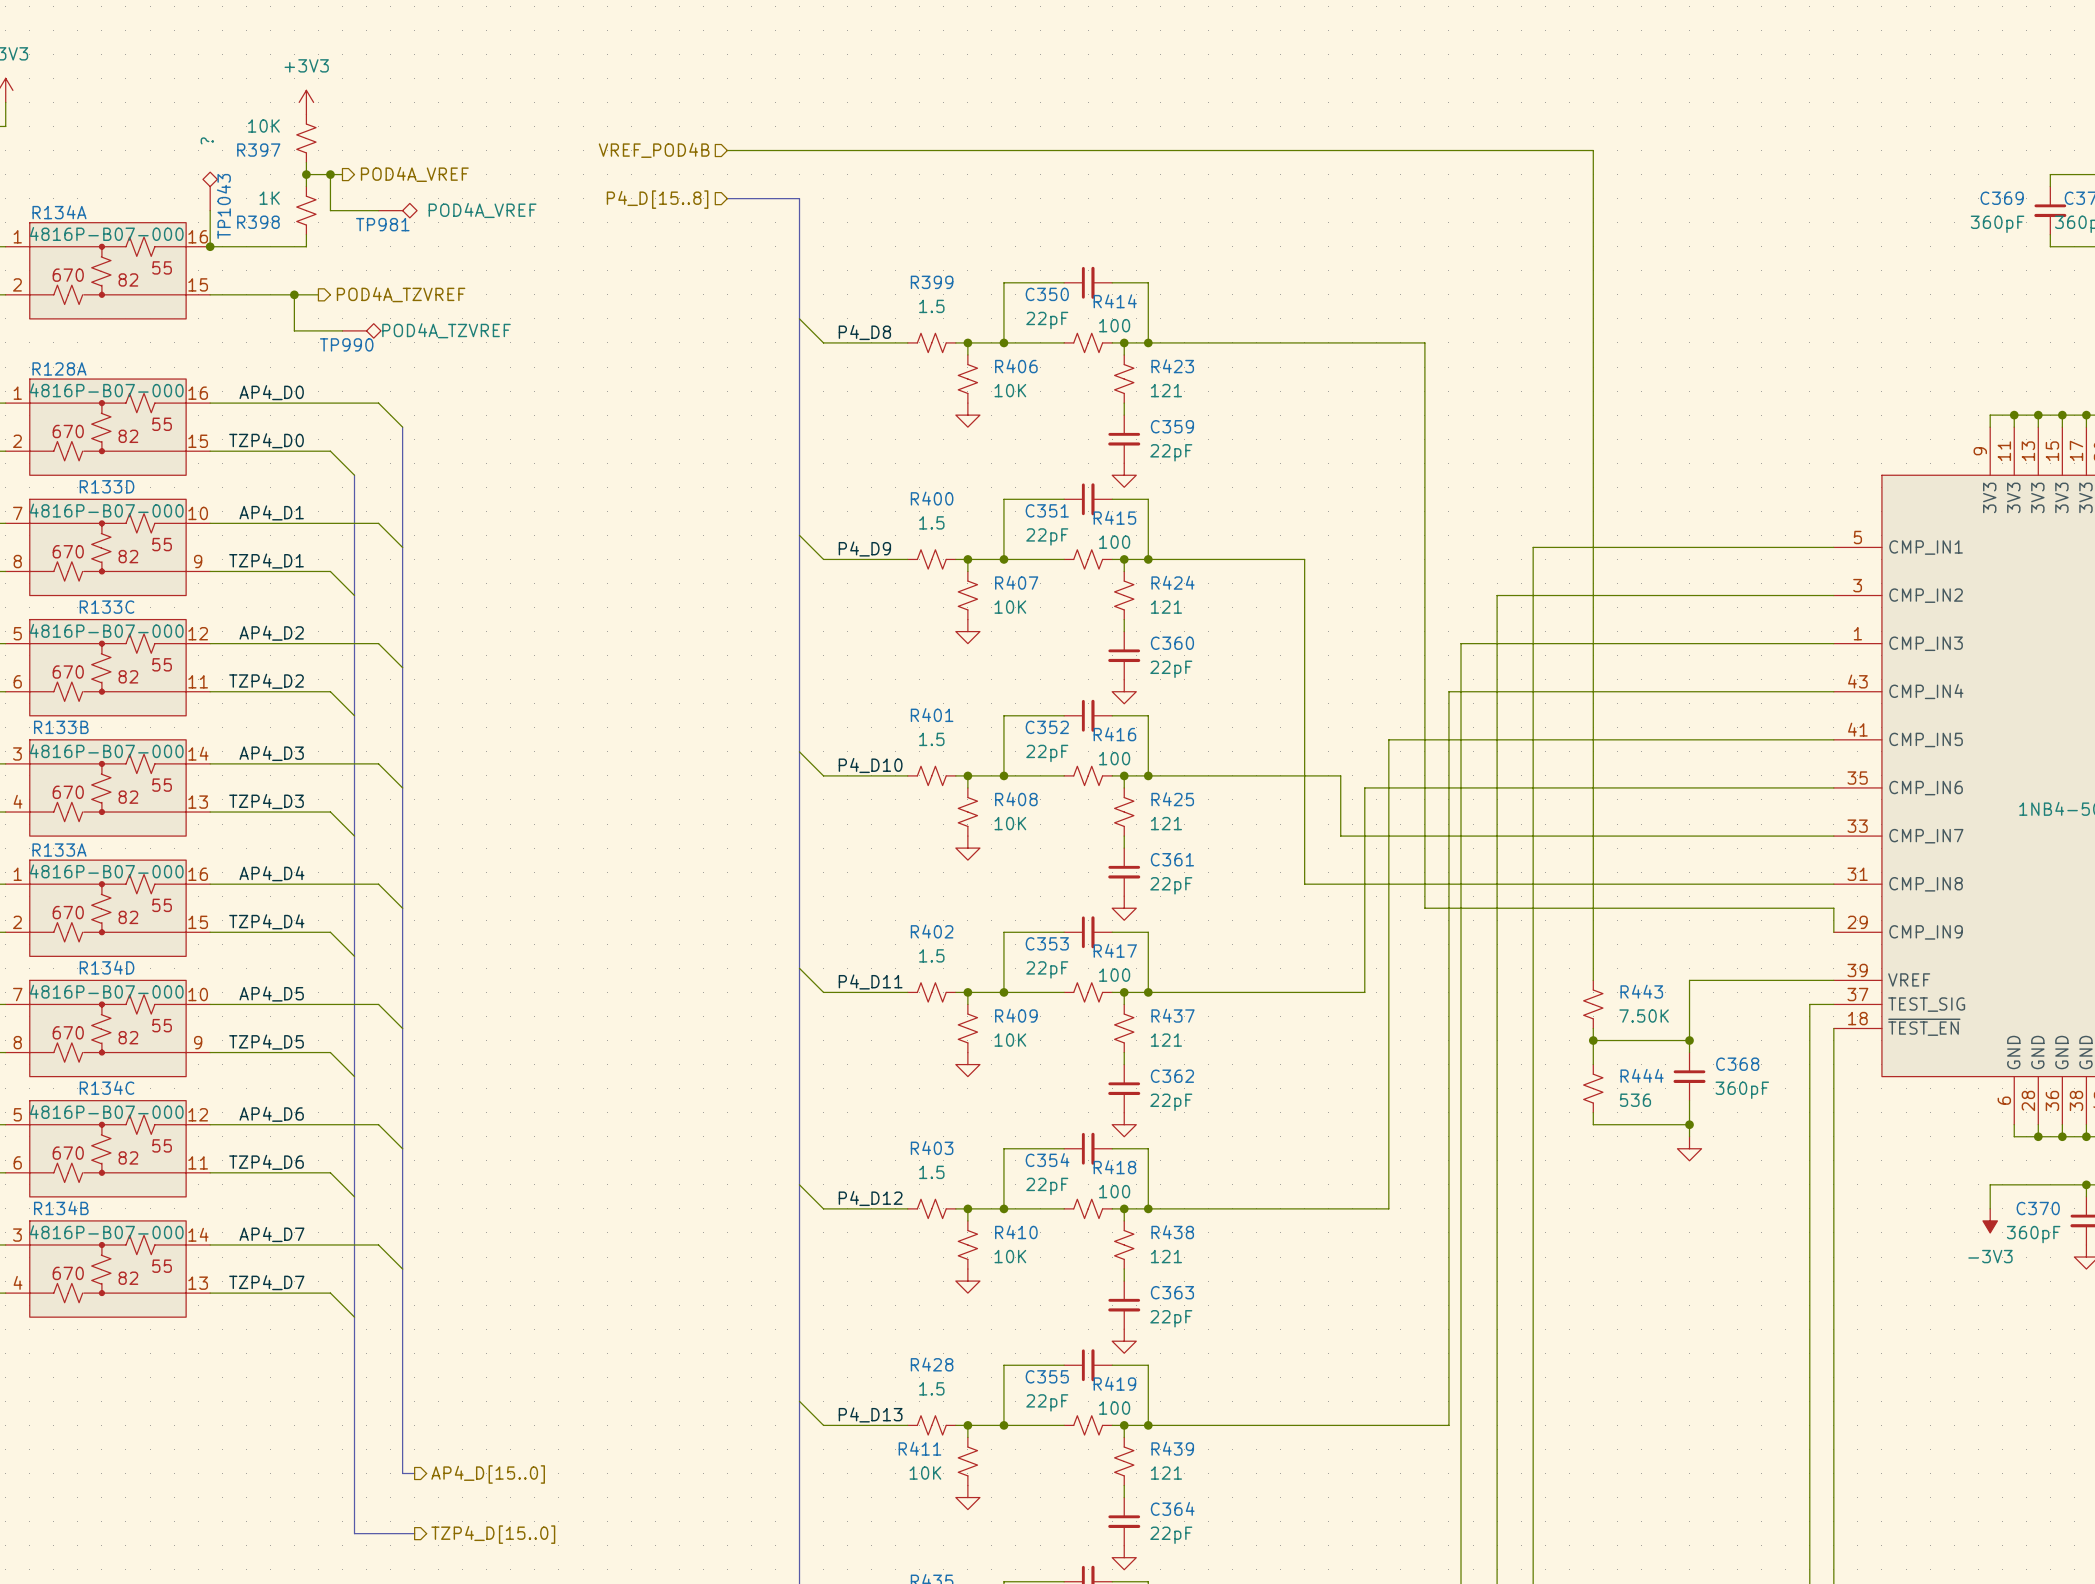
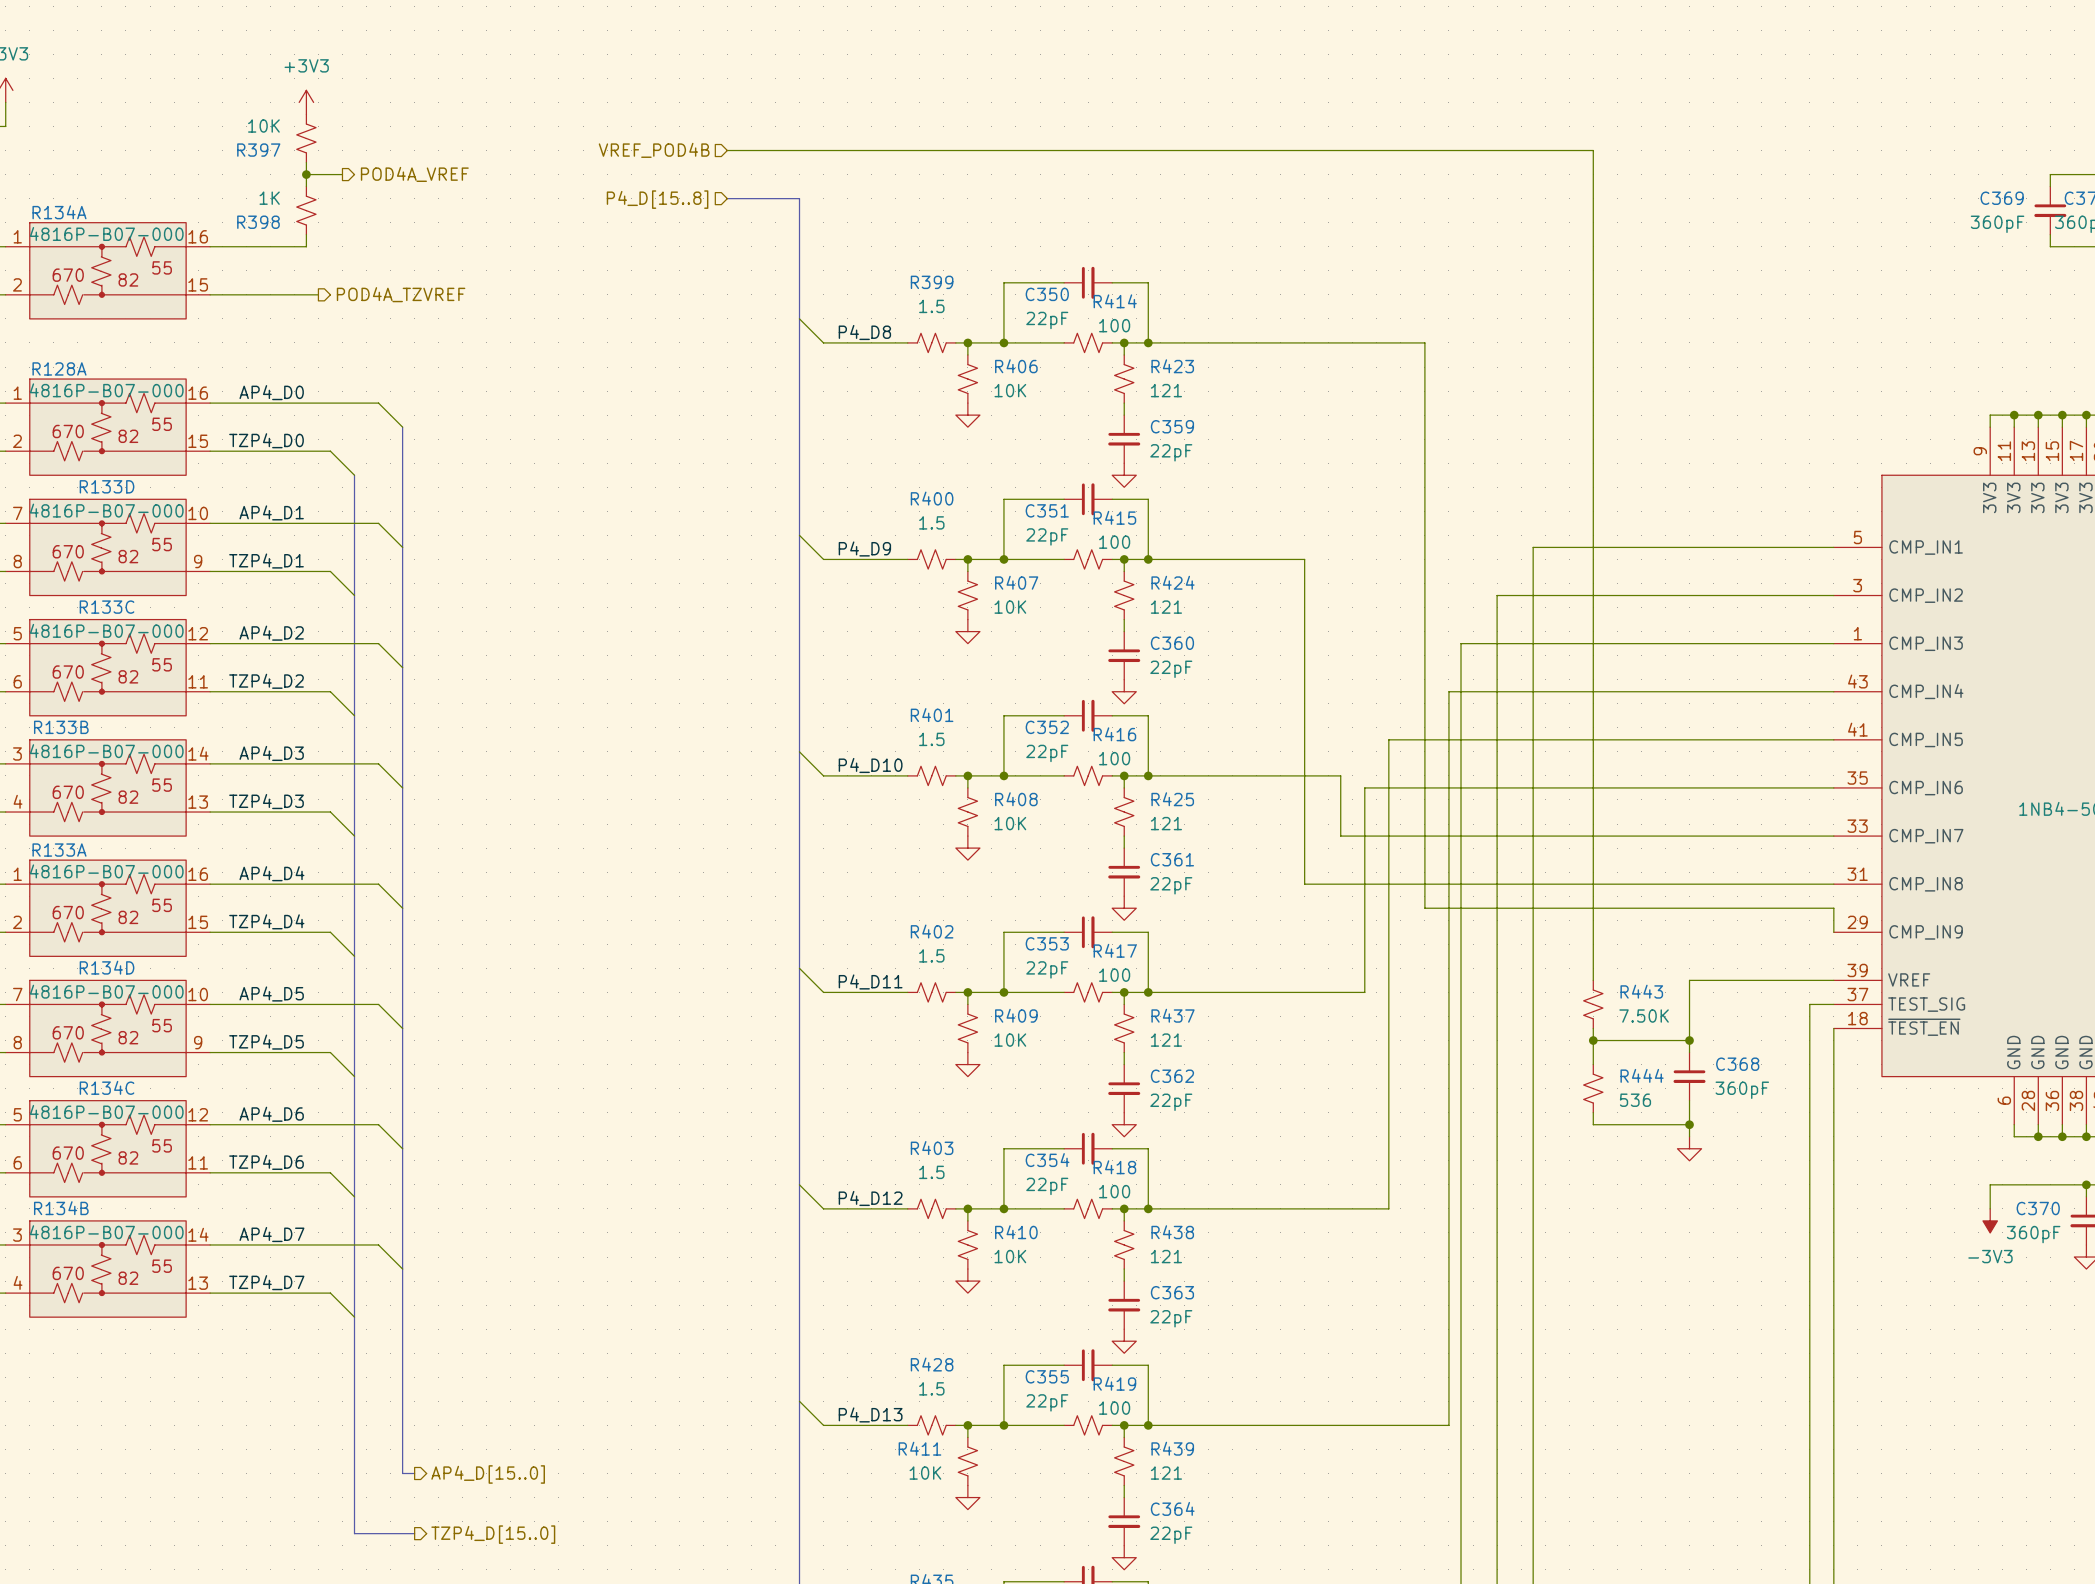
wire: (330, 174) (330, 210) (378, 210) -> none
junction: (330, 174) -> none
TP1043: ? (210, 191) -> none
wire: (210, 210) (210, 246) -> none
TP981: POD4A_VREF (397, 210) -> none
junction: (210, 246) -> none
wire: (294, 294) (294, 330) (342, 330) -> none
junction: (294, 294) -> none
TP990: POD4A_TZVREF (361, 330) -> none

